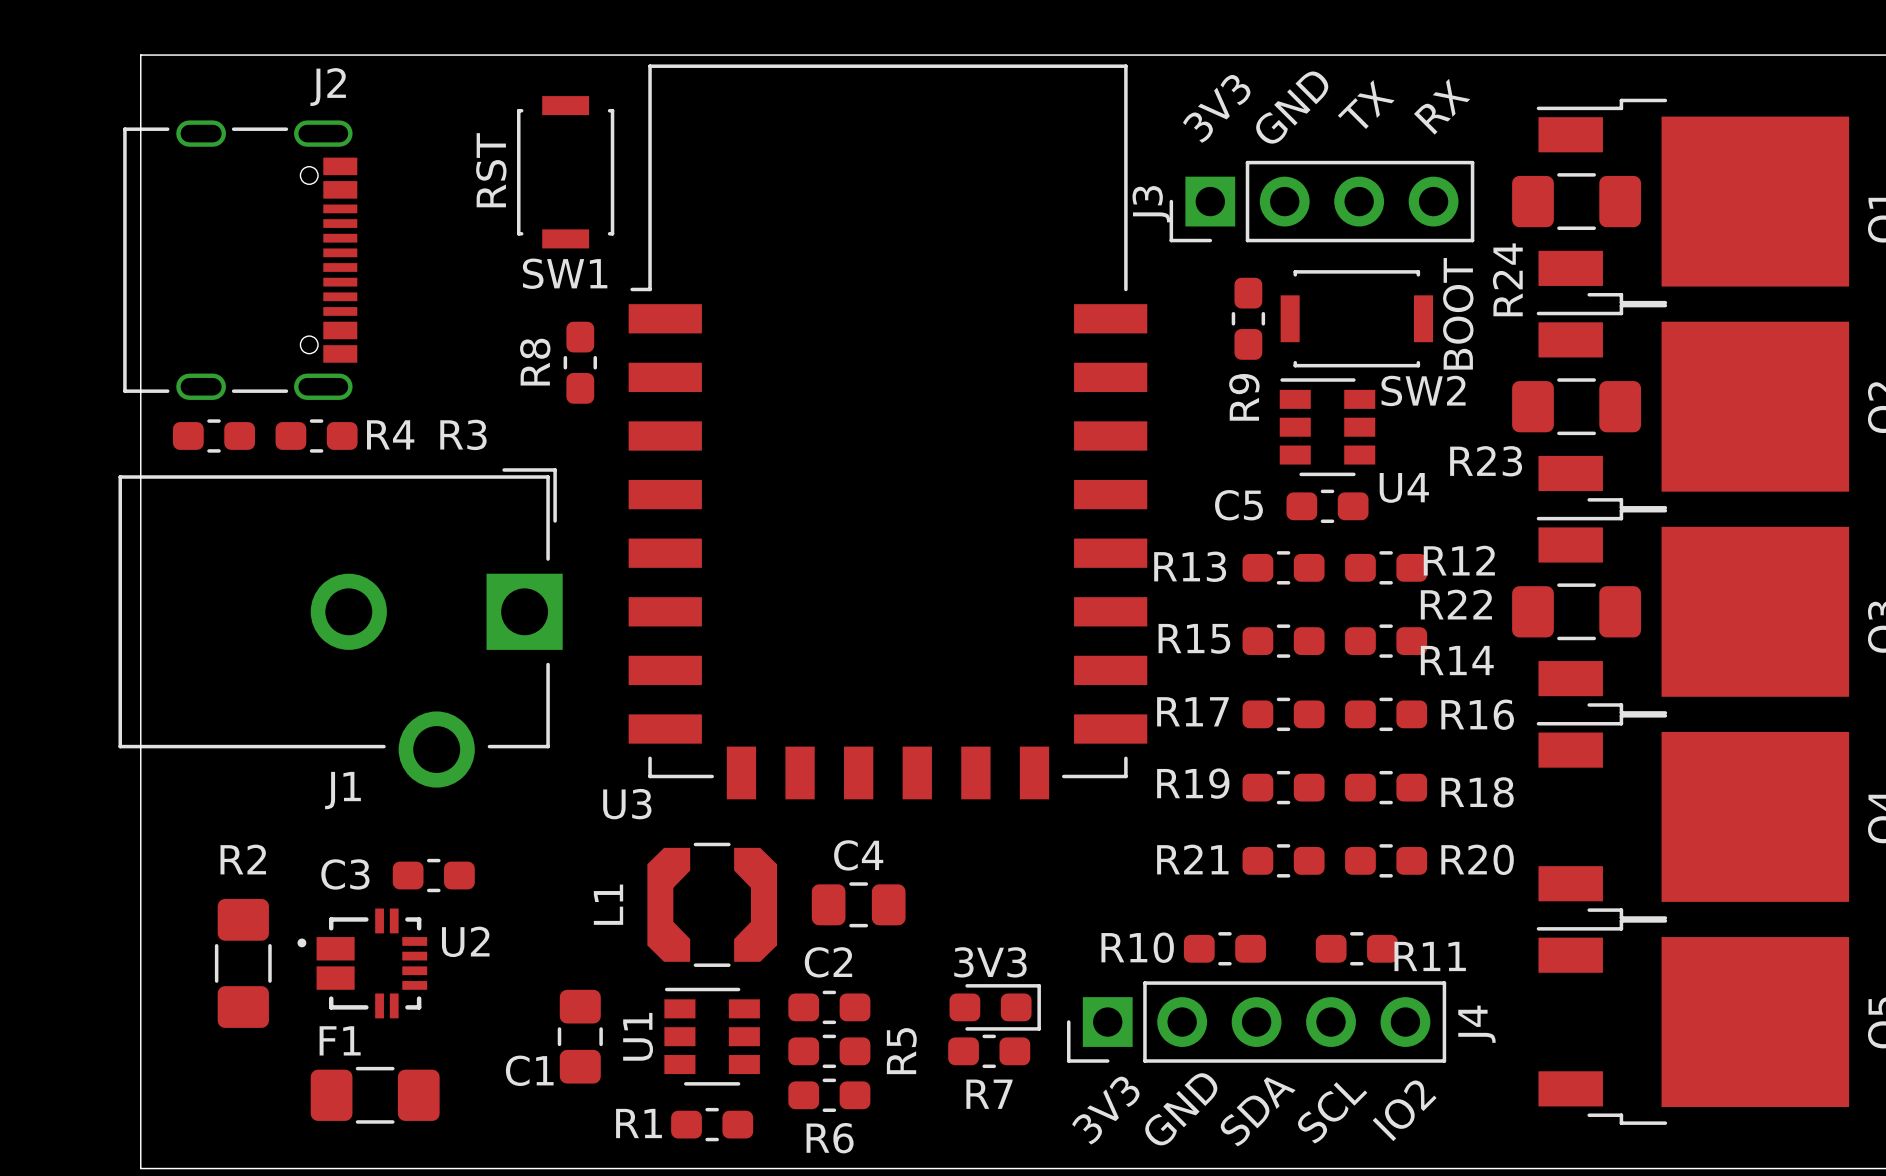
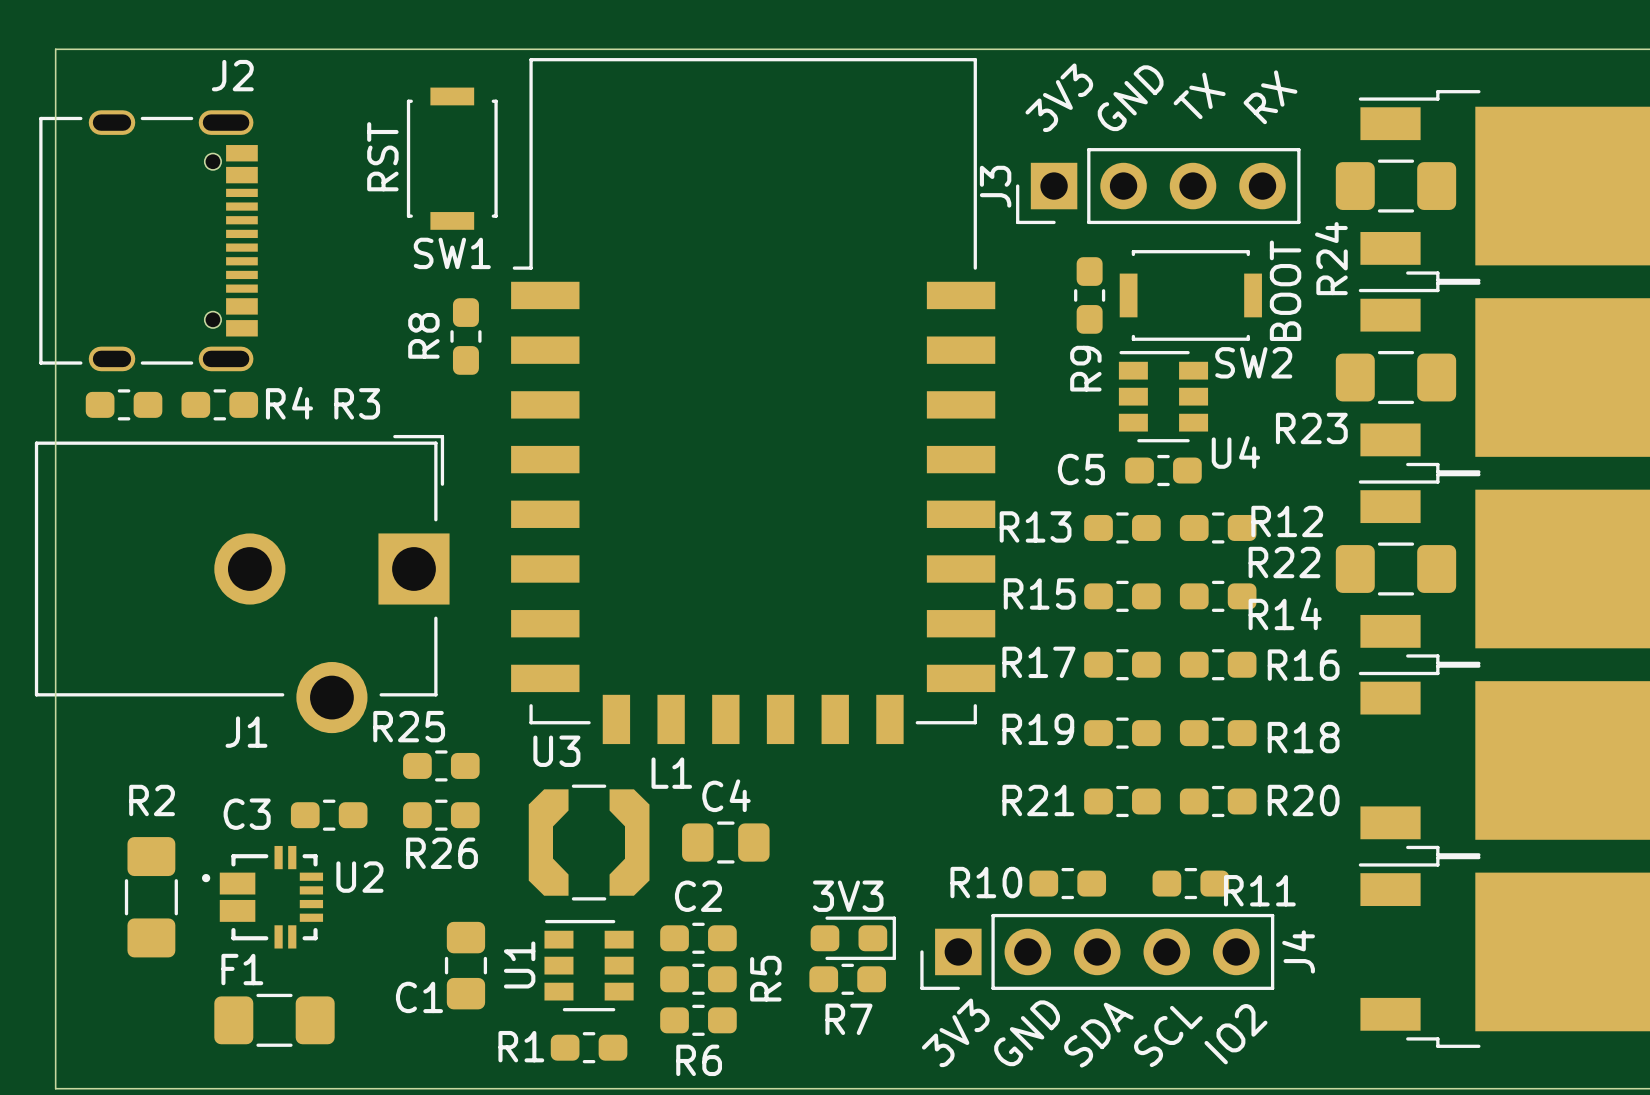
U3 name position: U3 (627, 804) -> U3 (556, 751)
R25: none -> (441, 765)
R26: none -> (441, 815)
L1 name rotation: 0° (608, 904) -> 90° clockwise (671, 773)
L1 name position: L1 (608, 904) -> L1 (671, 773)

